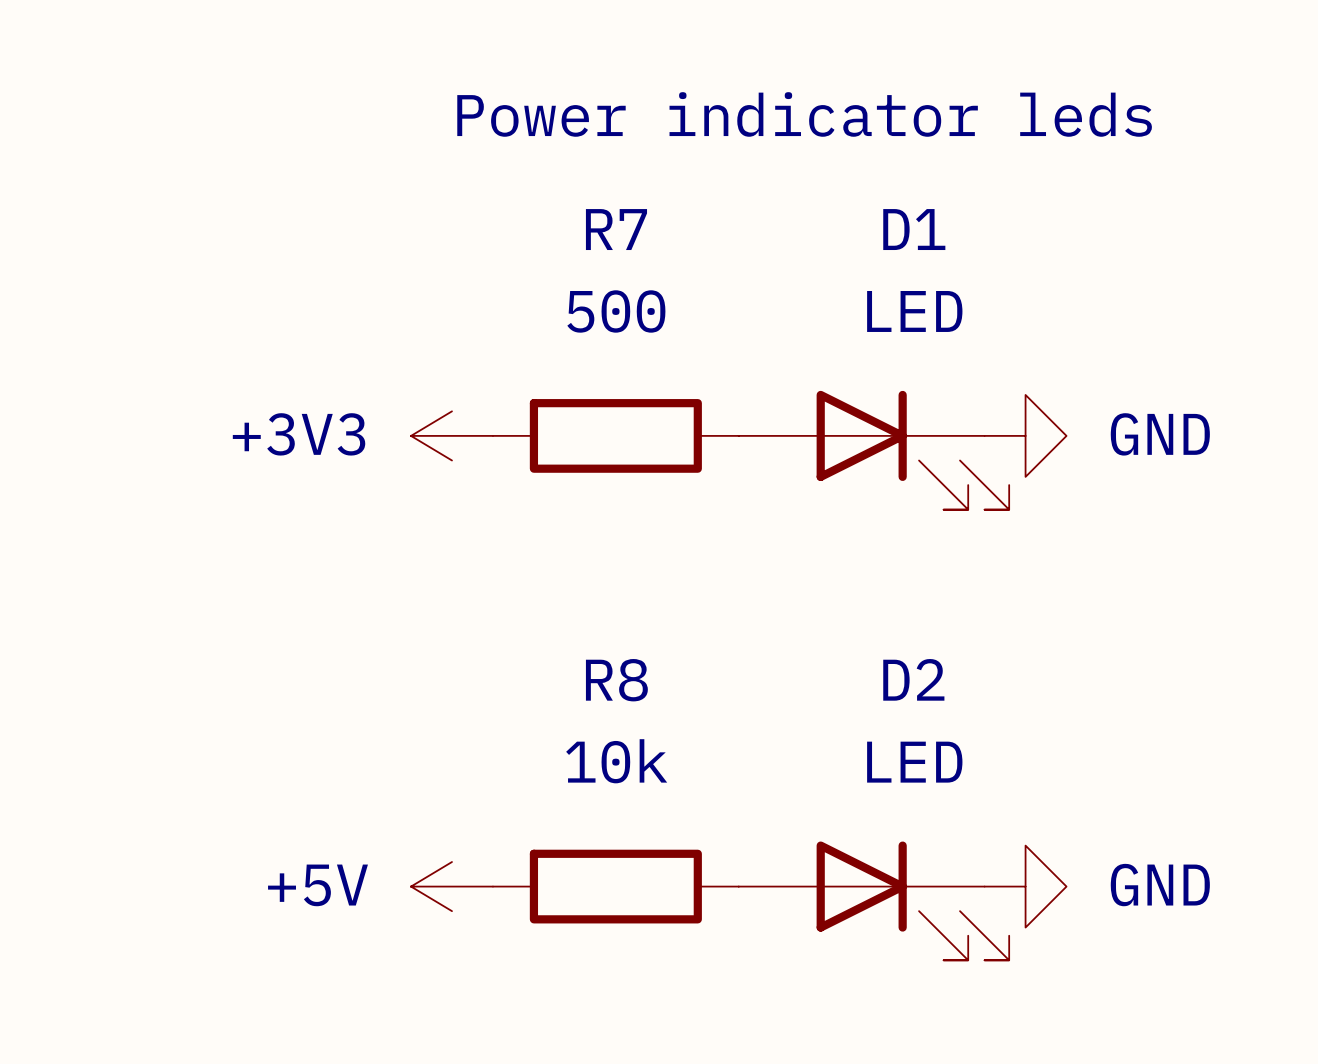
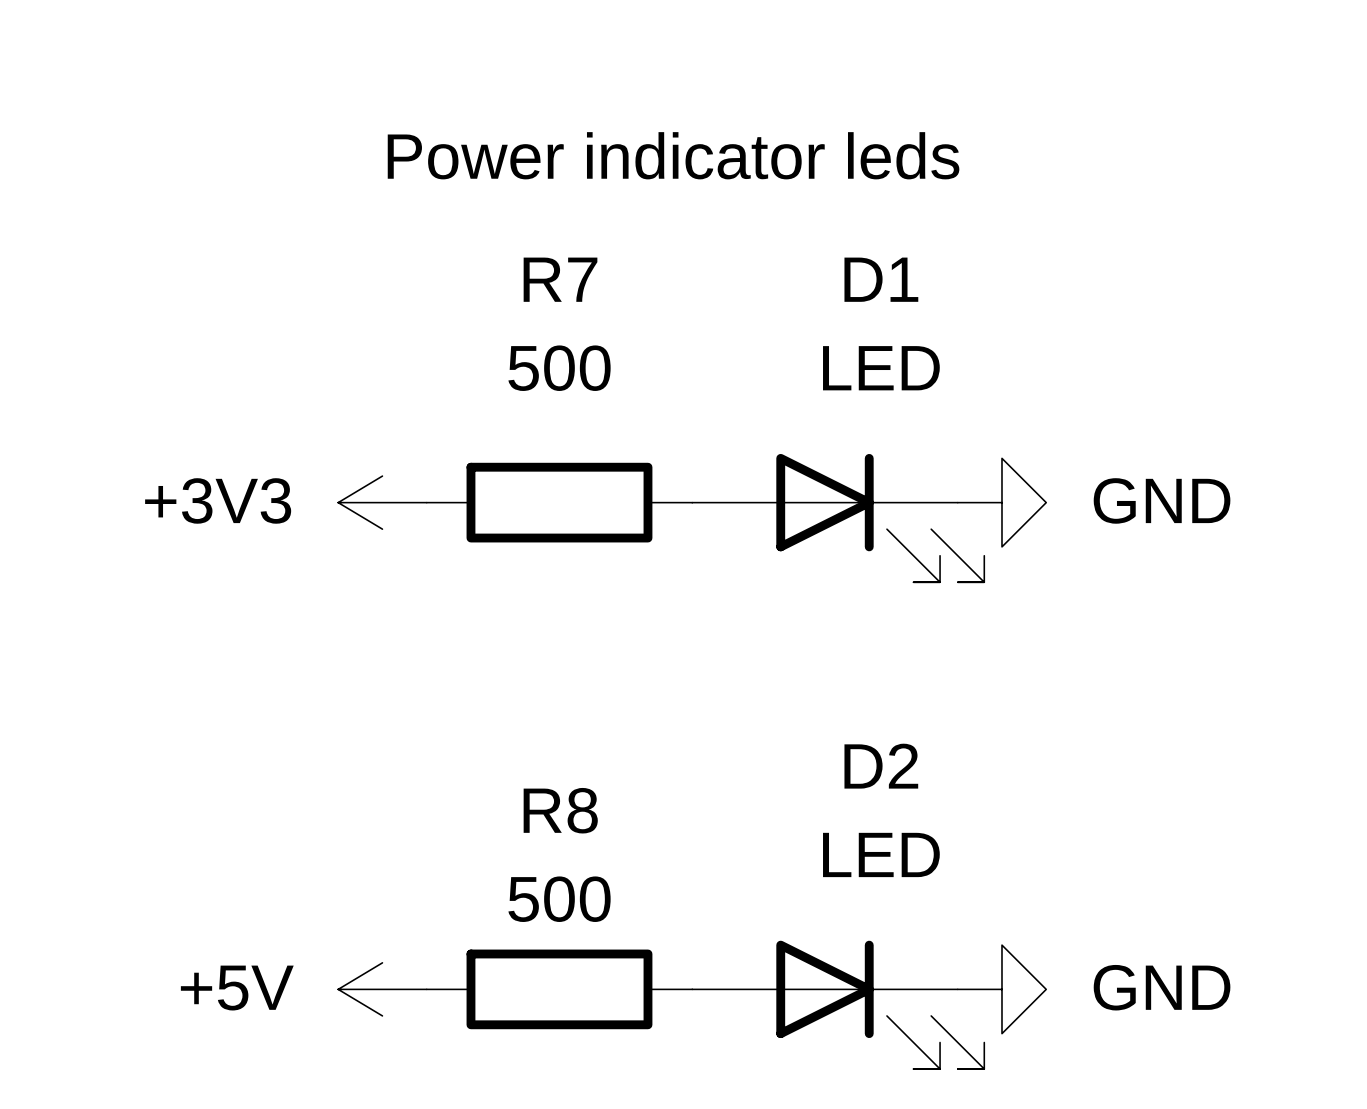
R8 name position: R8 (616, 680) -> R8 (560, 810)
R8 value: 10k (616, 761) -> 500 (559, 899)

